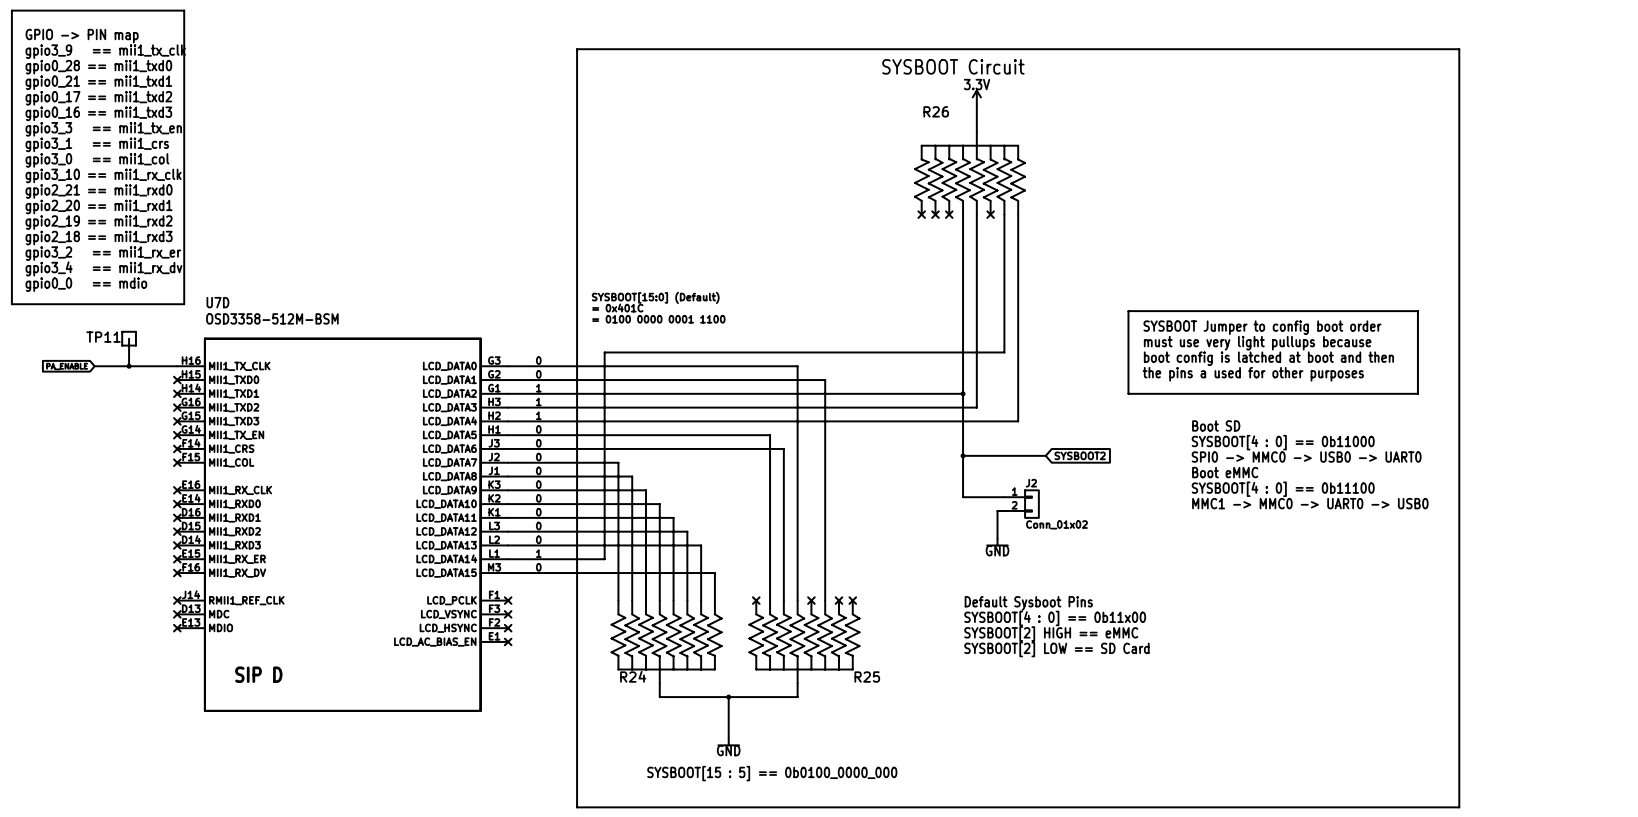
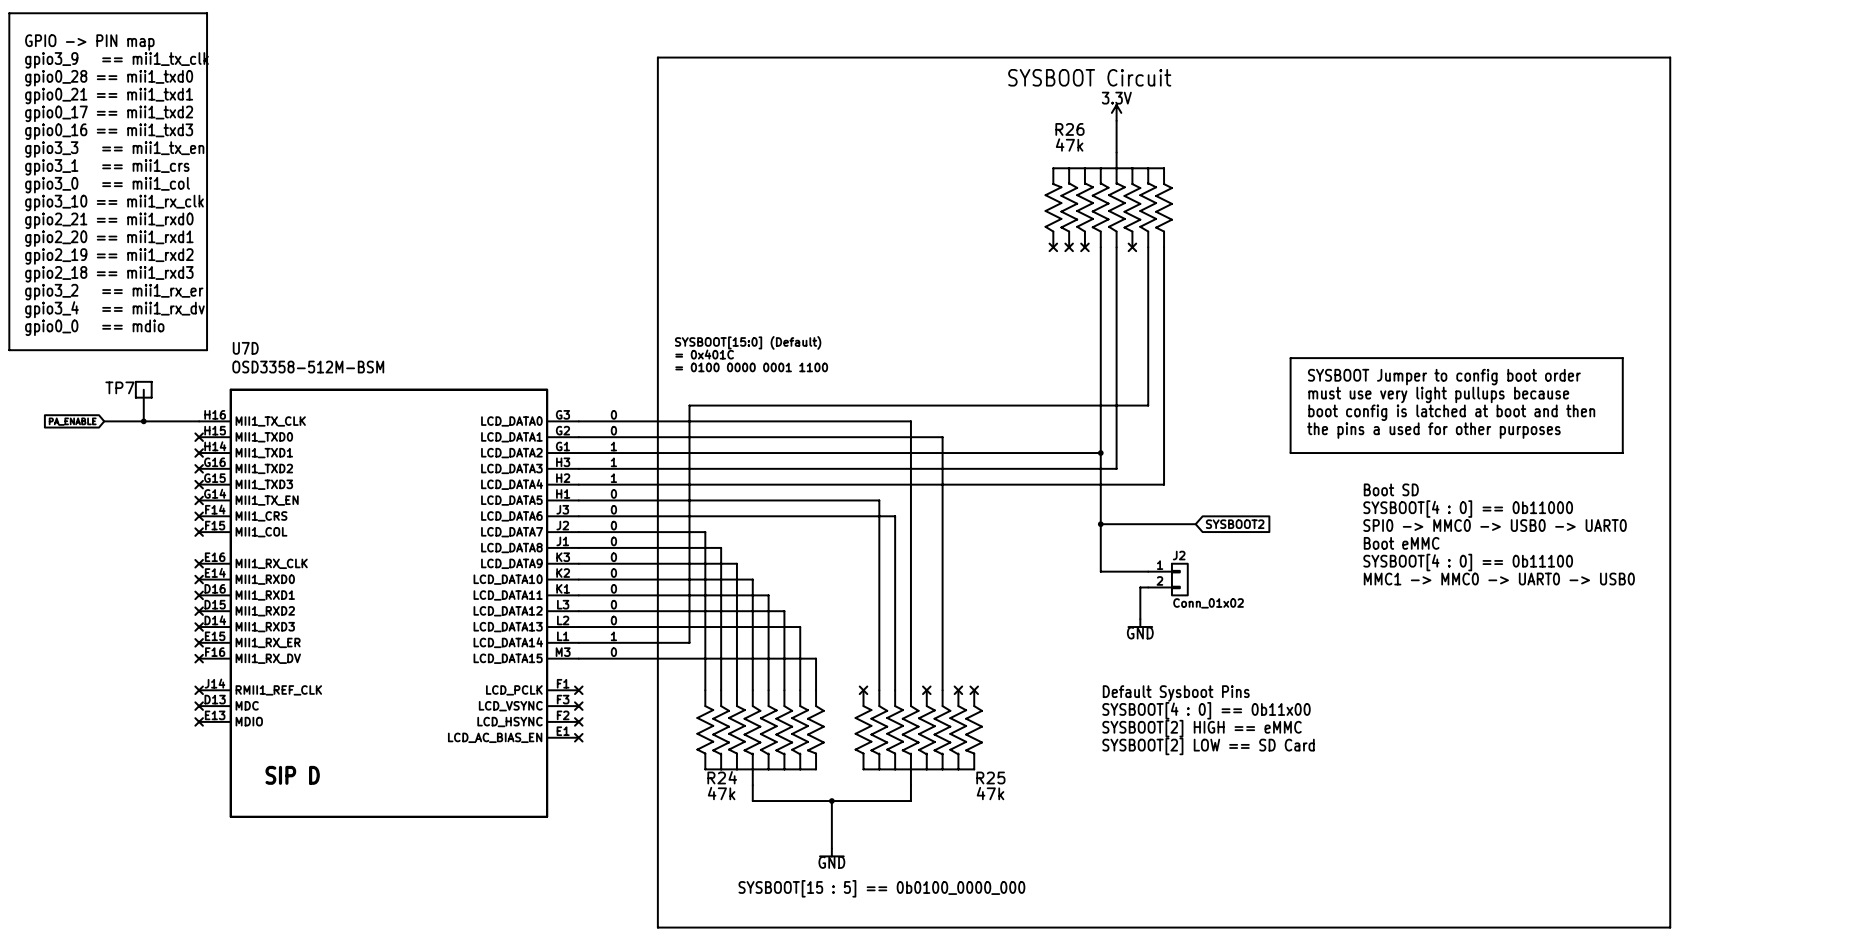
R26 value: none -> 47k (1069, 144)
TP11 name: TP11 (103, 337) -> TP7 (119, 387)
R24 value: none -> 47k (721, 793)
R25 value: none -> 47k (990, 793)

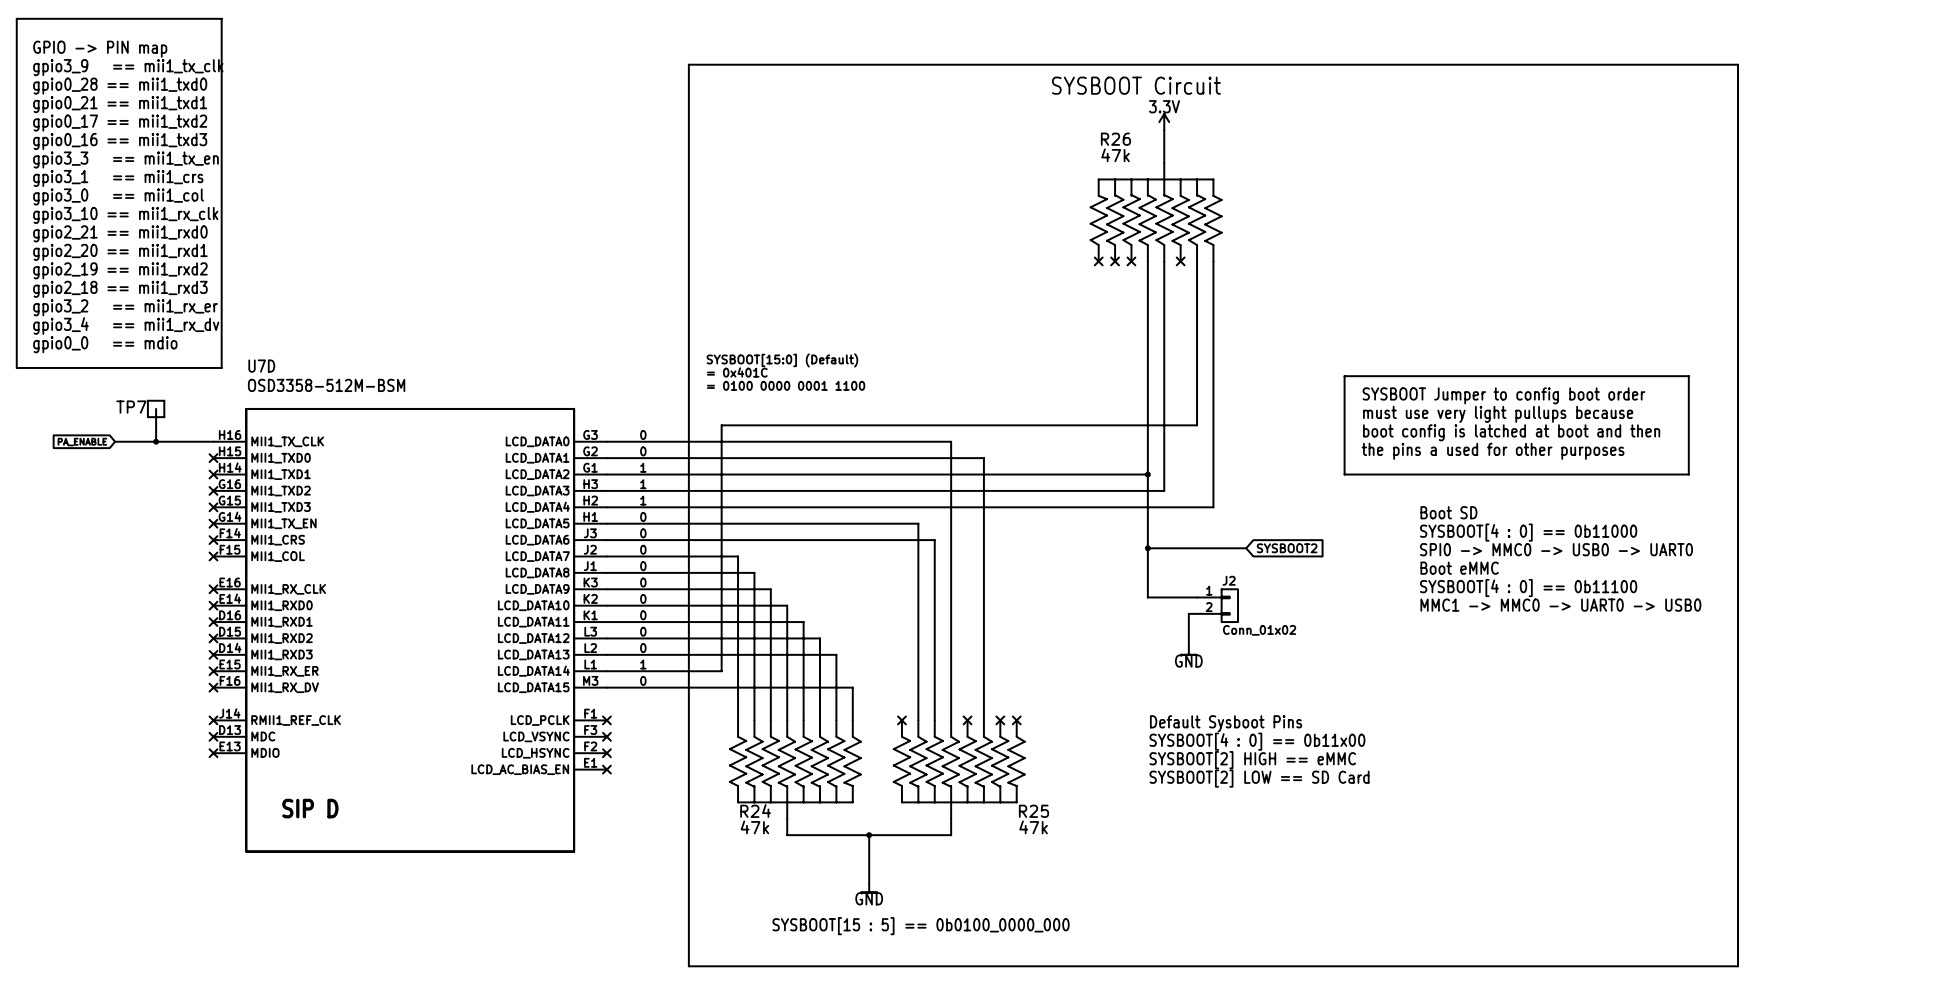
power symbol shape: [1127, 619, 1153, 628] -> [1180, 646, 1198, 655]
power symbol shape: [819, 848, 845, 858] -> [860, 884, 878, 893]

